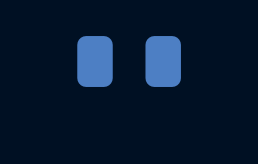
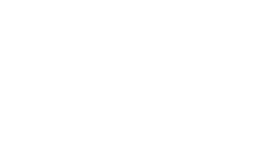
part: (129, 61) -> none

